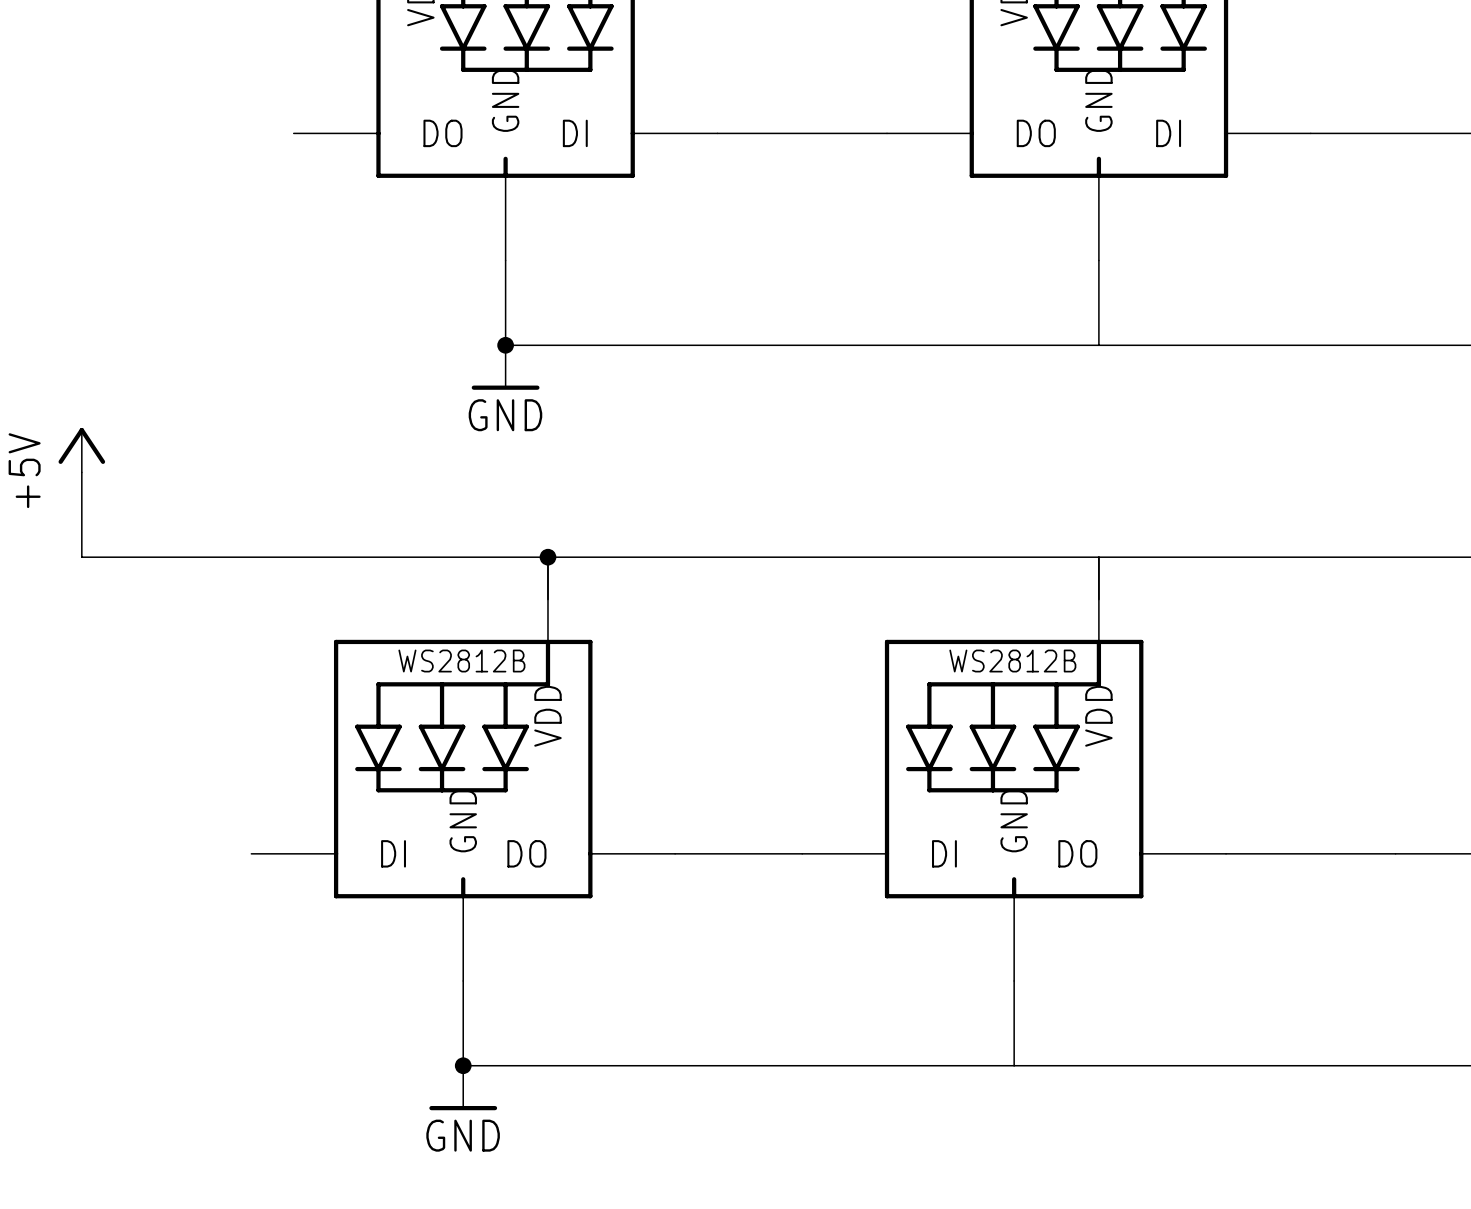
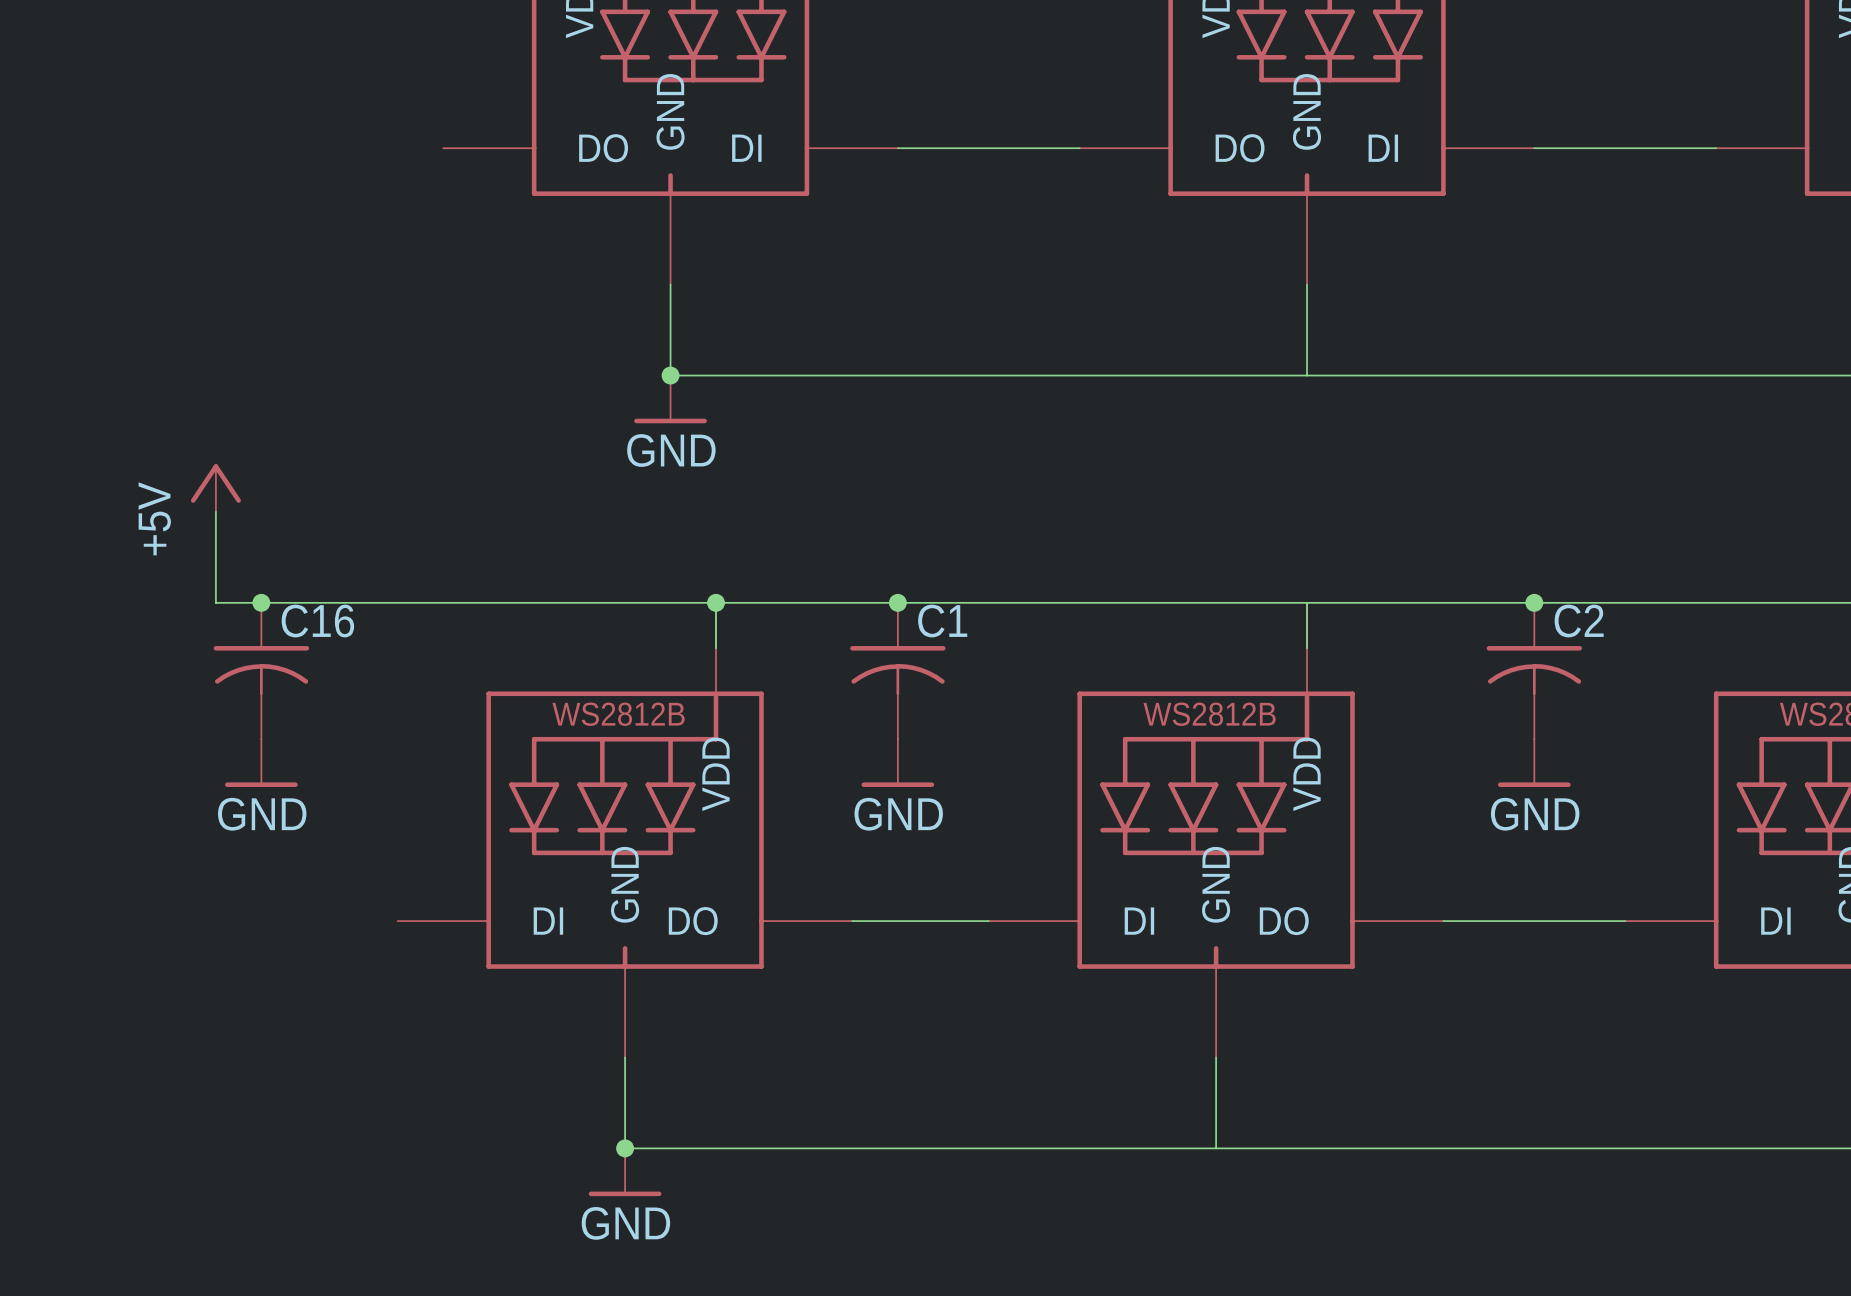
junction: none -> (261, 602)
junction: none -> (897, 602)
junction: none -> (1534, 602)
C16: none -> (261, 671)
C1: none -> (897, 671)
C2: none -> (1534, 671)
power symbol: none -> GND (261, 763)
power symbol: none -> GND (897, 763)
power symbol: none -> GND (1534, 763)

